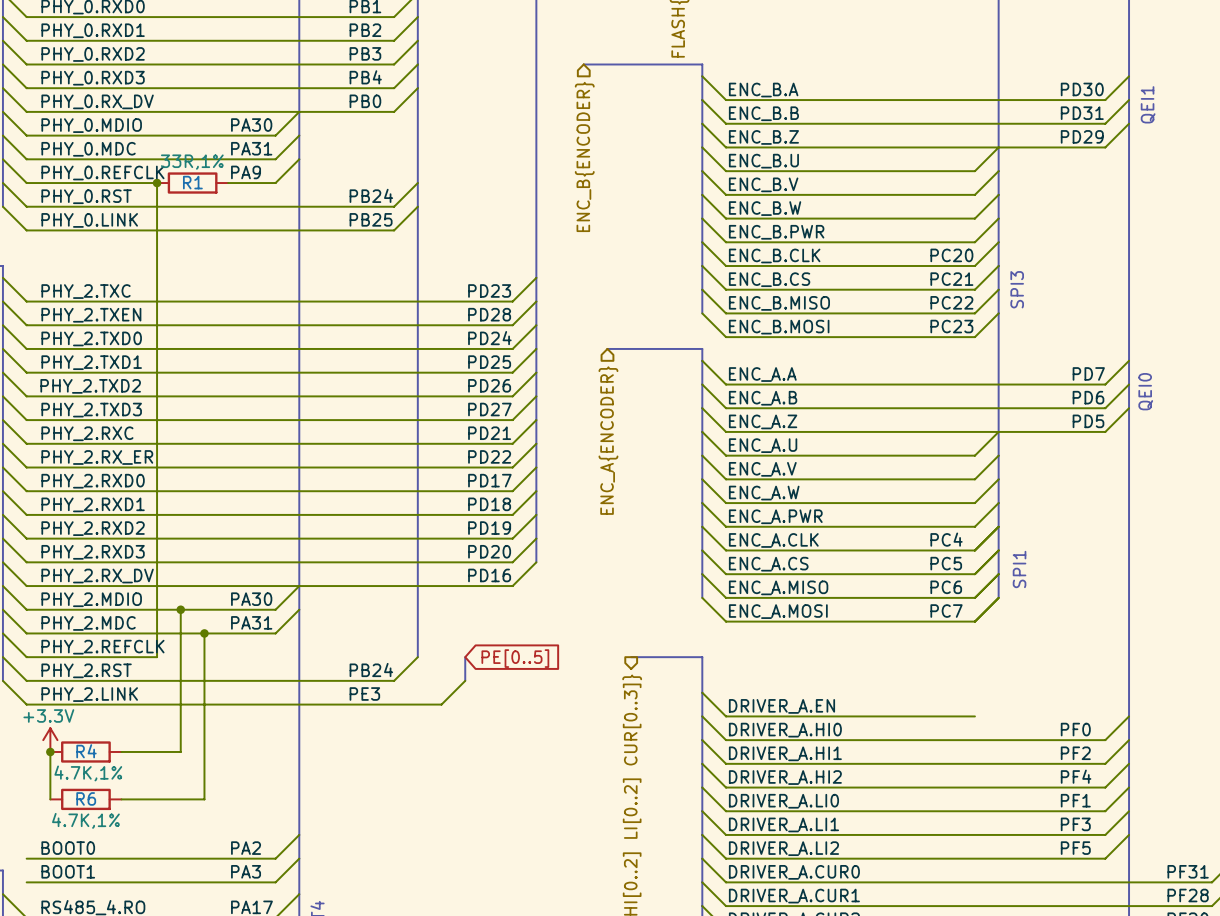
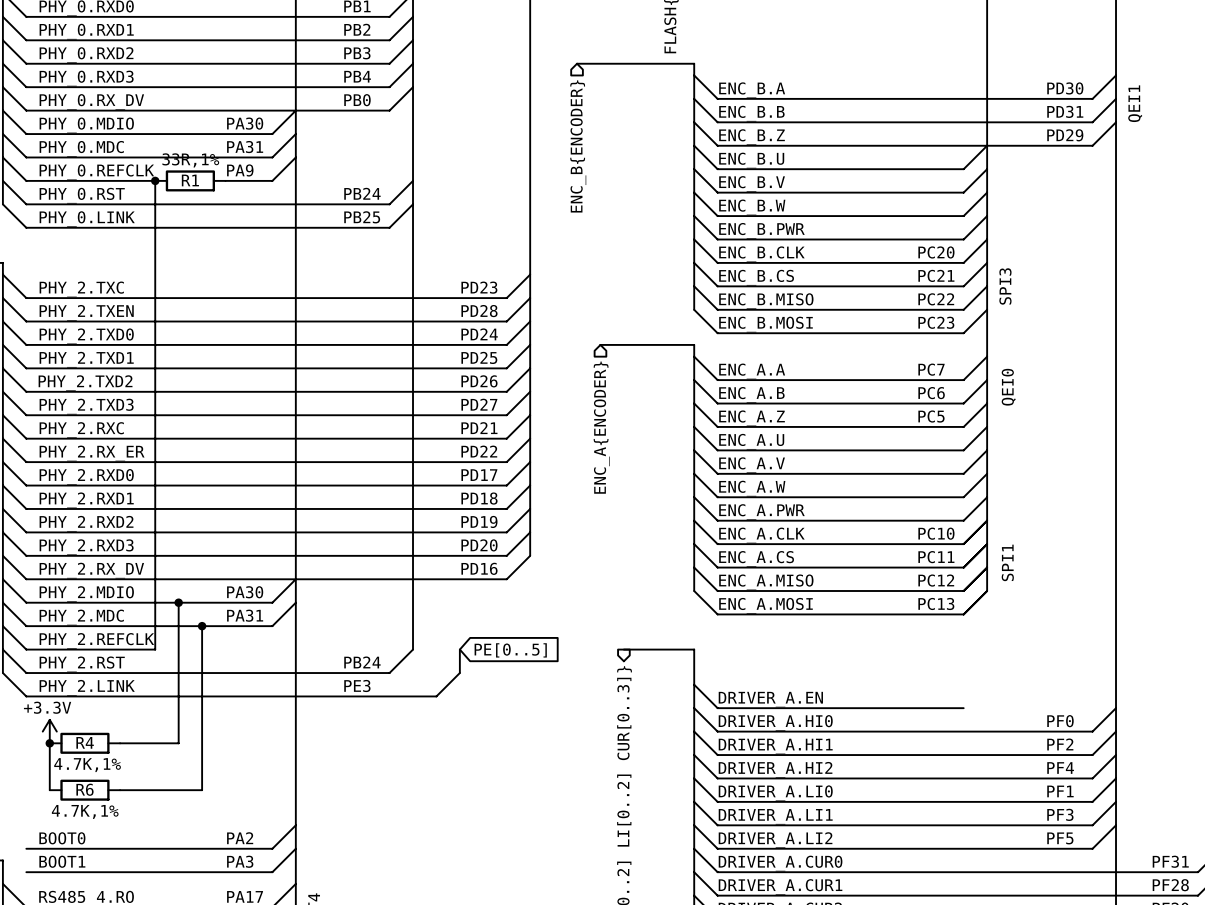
wire: (1129, 360) (1105, 384) (974, 384) -> (987, 356) (963, 380)
label: none -> PC7 (931, 369)
label: PD7 (1088, 373) -> none
wire: (1129, 384) (1105, 408) (974, 408) -> (987, 380) (963, 403)
text position: QEI0 (1145, 391) -> QEI0 (1008, 387)
label: none -> PC6 (931, 393)
label: PD6 (1088, 397) -> none
wire: (1129, 408) (1105, 431) (974, 431) -> (987, 403) (963, 426)
label: none -> PC5 (931, 416)
label: PD5 (1088, 421) -> none
label: PC4 (946, 539) -> PC10 (936, 533)
label: PC5 (946, 563) -> PC11 (936, 557)
label: PC6 (946, 587) -> PC12 (936, 580)
label: PC7 (946, 611) -> PC13 (936, 603)

